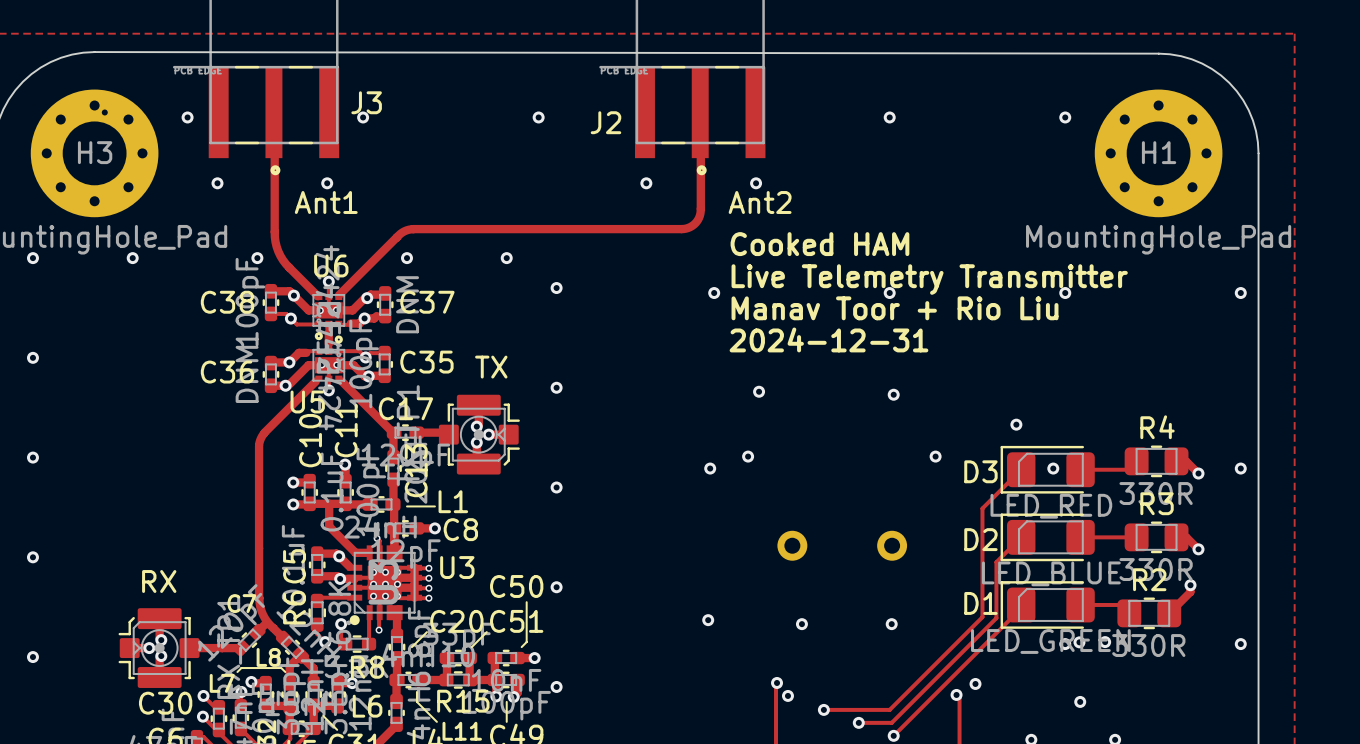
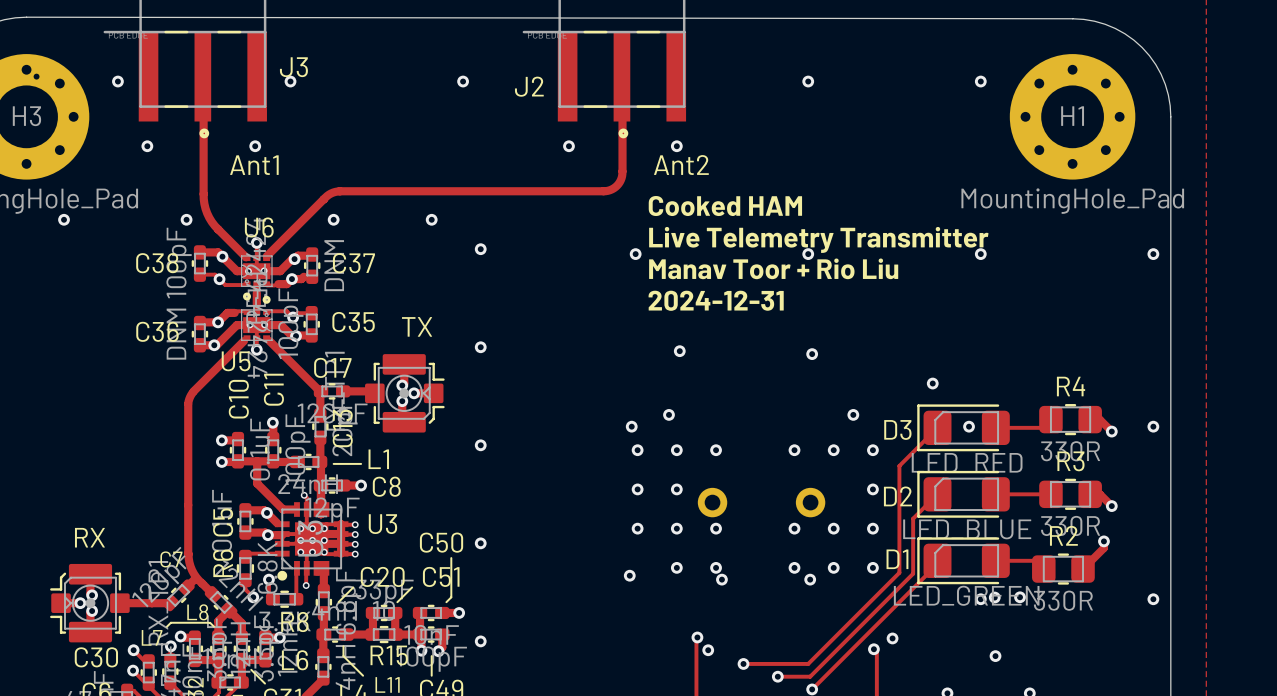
via: none -> (637, 450)
via: none -> (676, 450)
via: none -> (716, 450)
via: none -> (794, 450)
via: none -> (833, 450)
via: none -> (872, 450)
via: none -> (637, 489)
via: none -> (676, 489)
via: none -> (872, 489)
via: none -> (637, 528)
via: none -> (676, 528)
via: none -> (716, 528)
via: none -> (794, 528)
via: none -> (833, 528)
via: none -> (872, 528)
via: none -> (676, 567)
via: none -> (716, 567)
via: none -> (794, 567)
via: none -> (833, 567)
via: none -> (872, 567)

